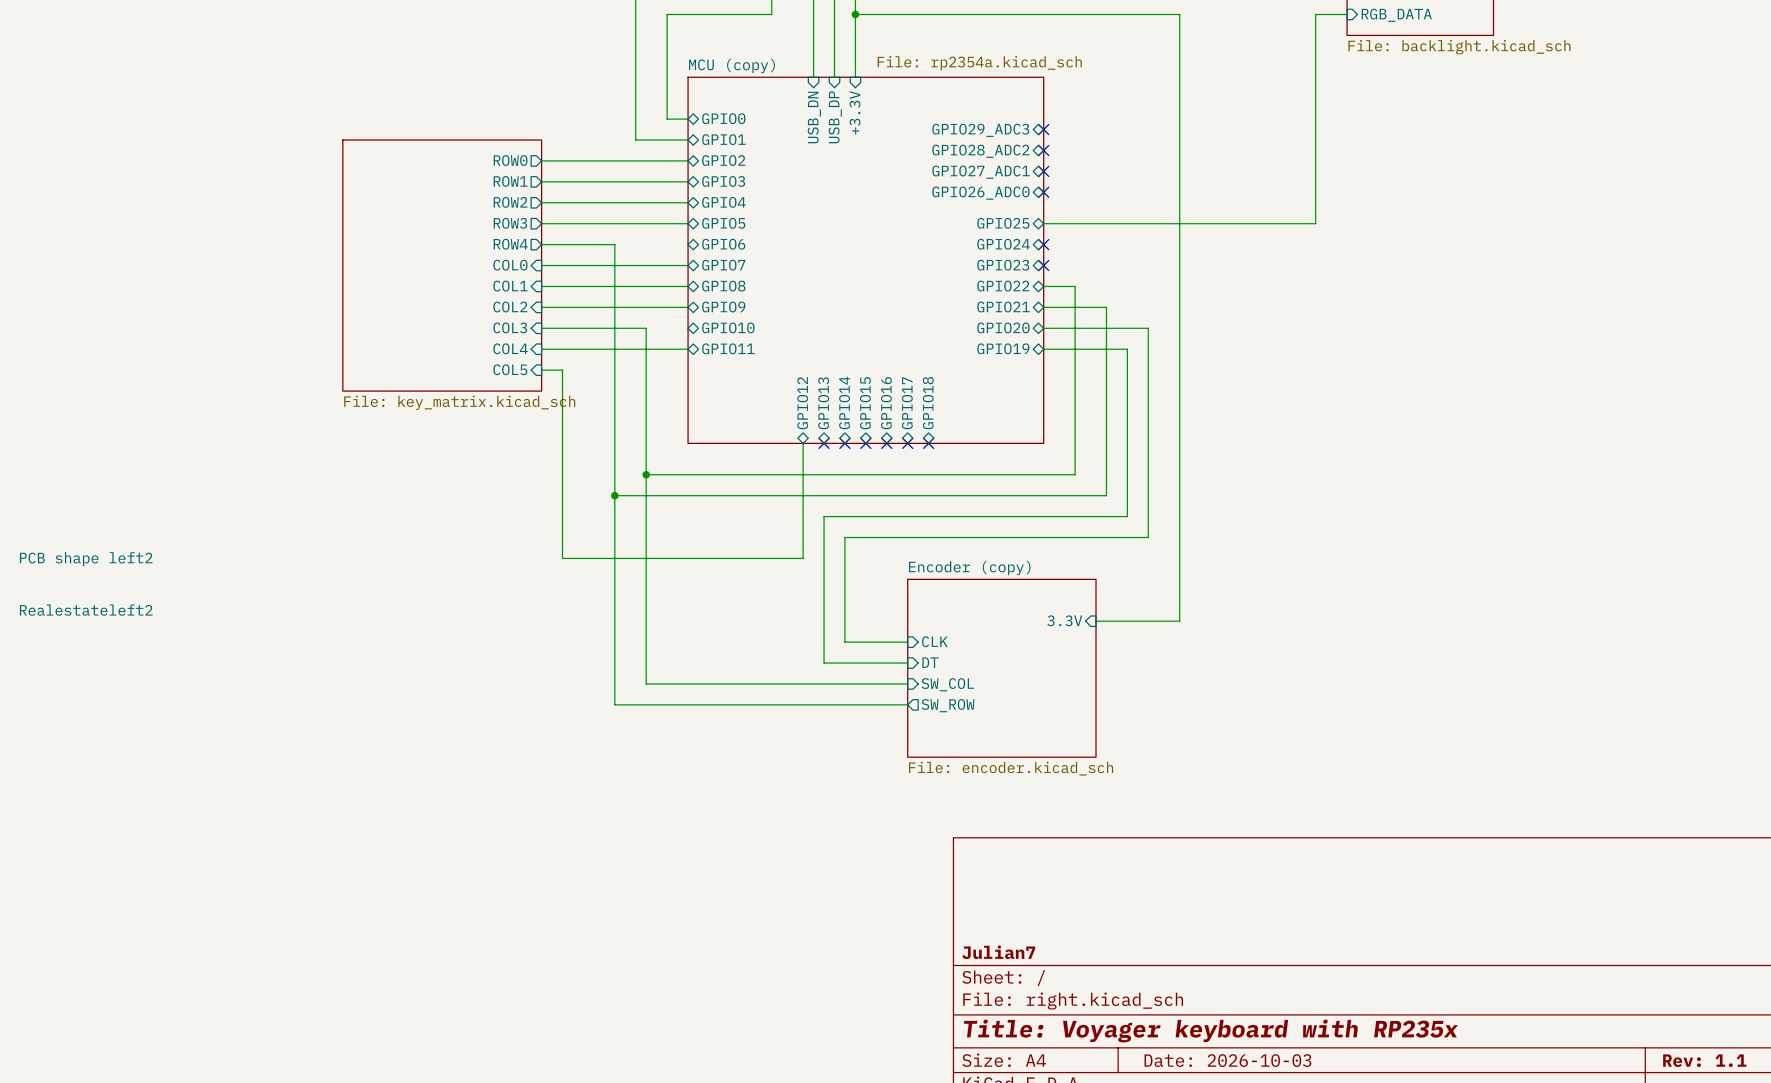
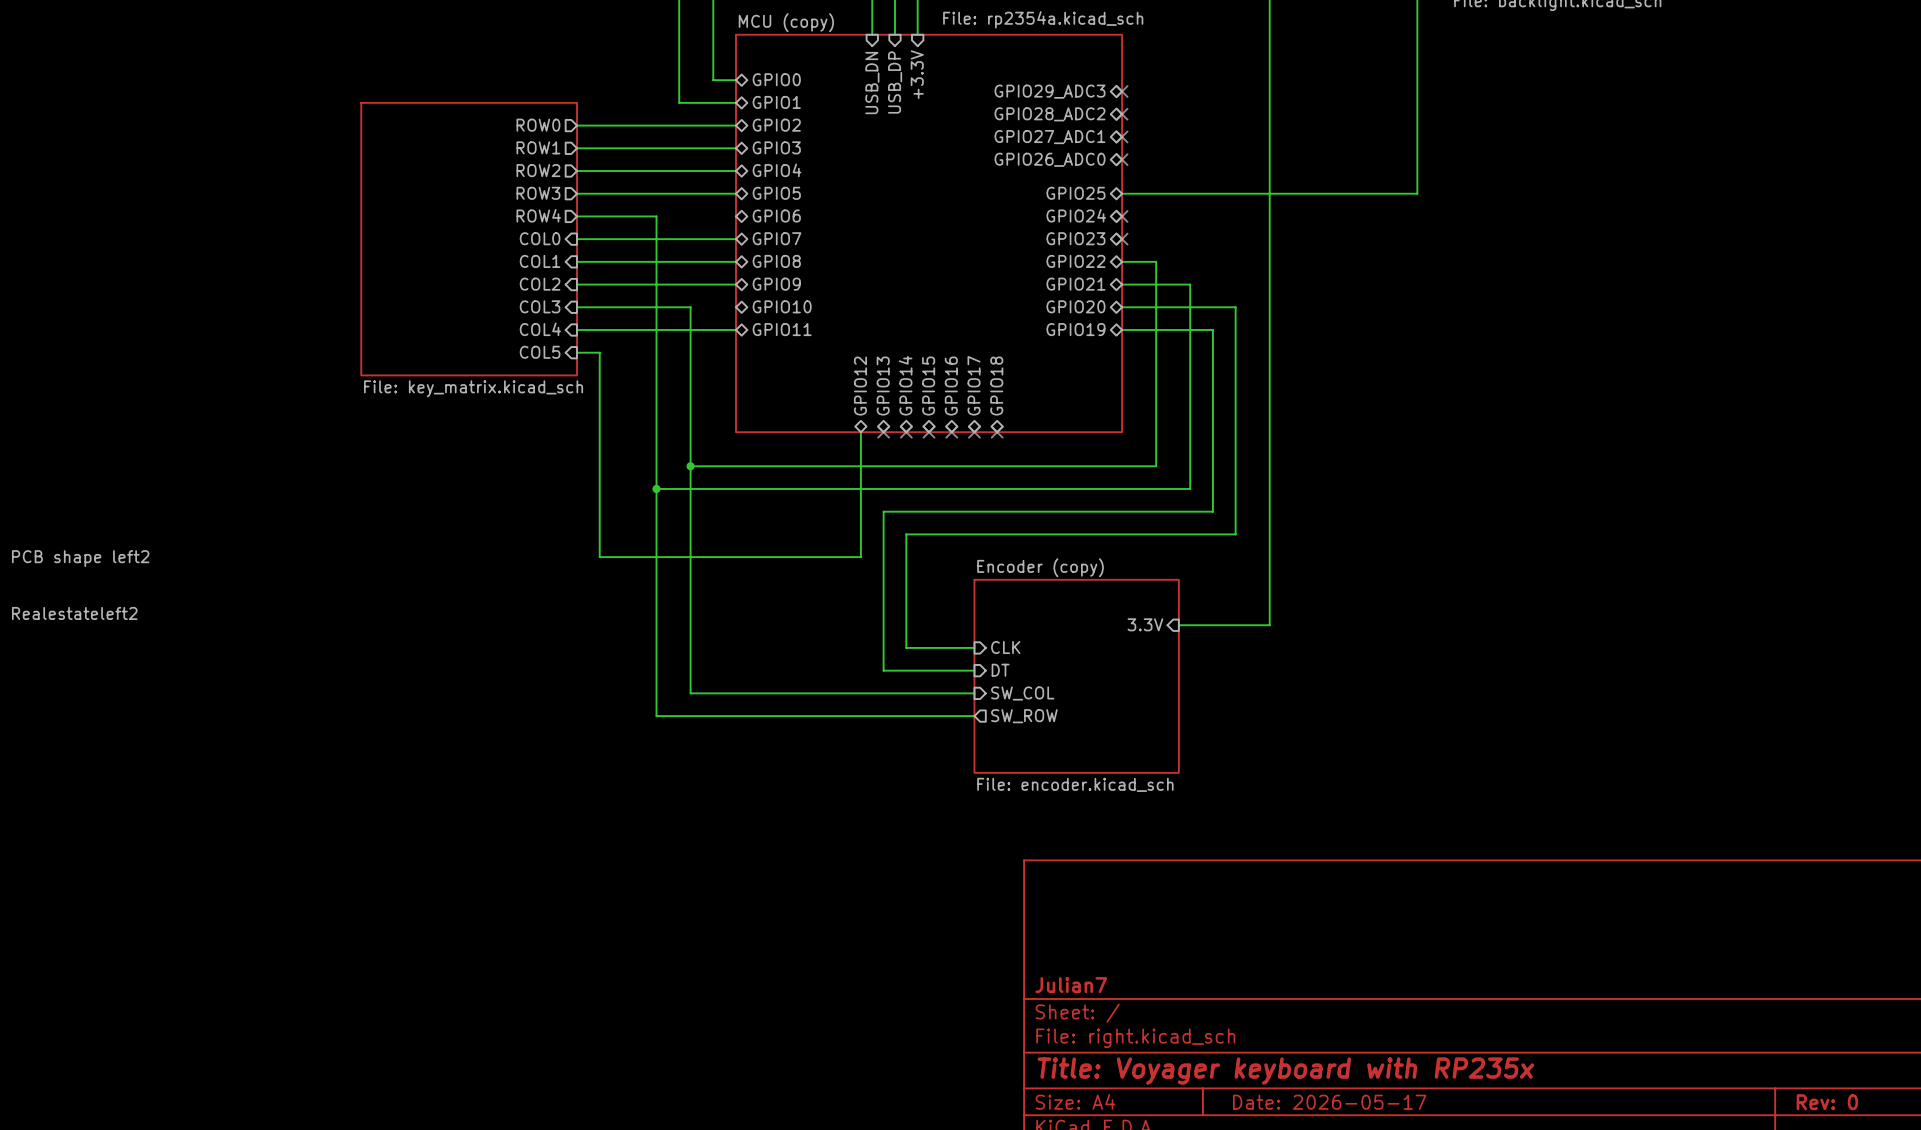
title block: Date: 2026-10-03 (1227, 1060) -> Date: 2026-05-17 (1329, 1102)
title block: Rev: 1.1 (1704, 1060) -> Rev: 0 (1827, 1102)

